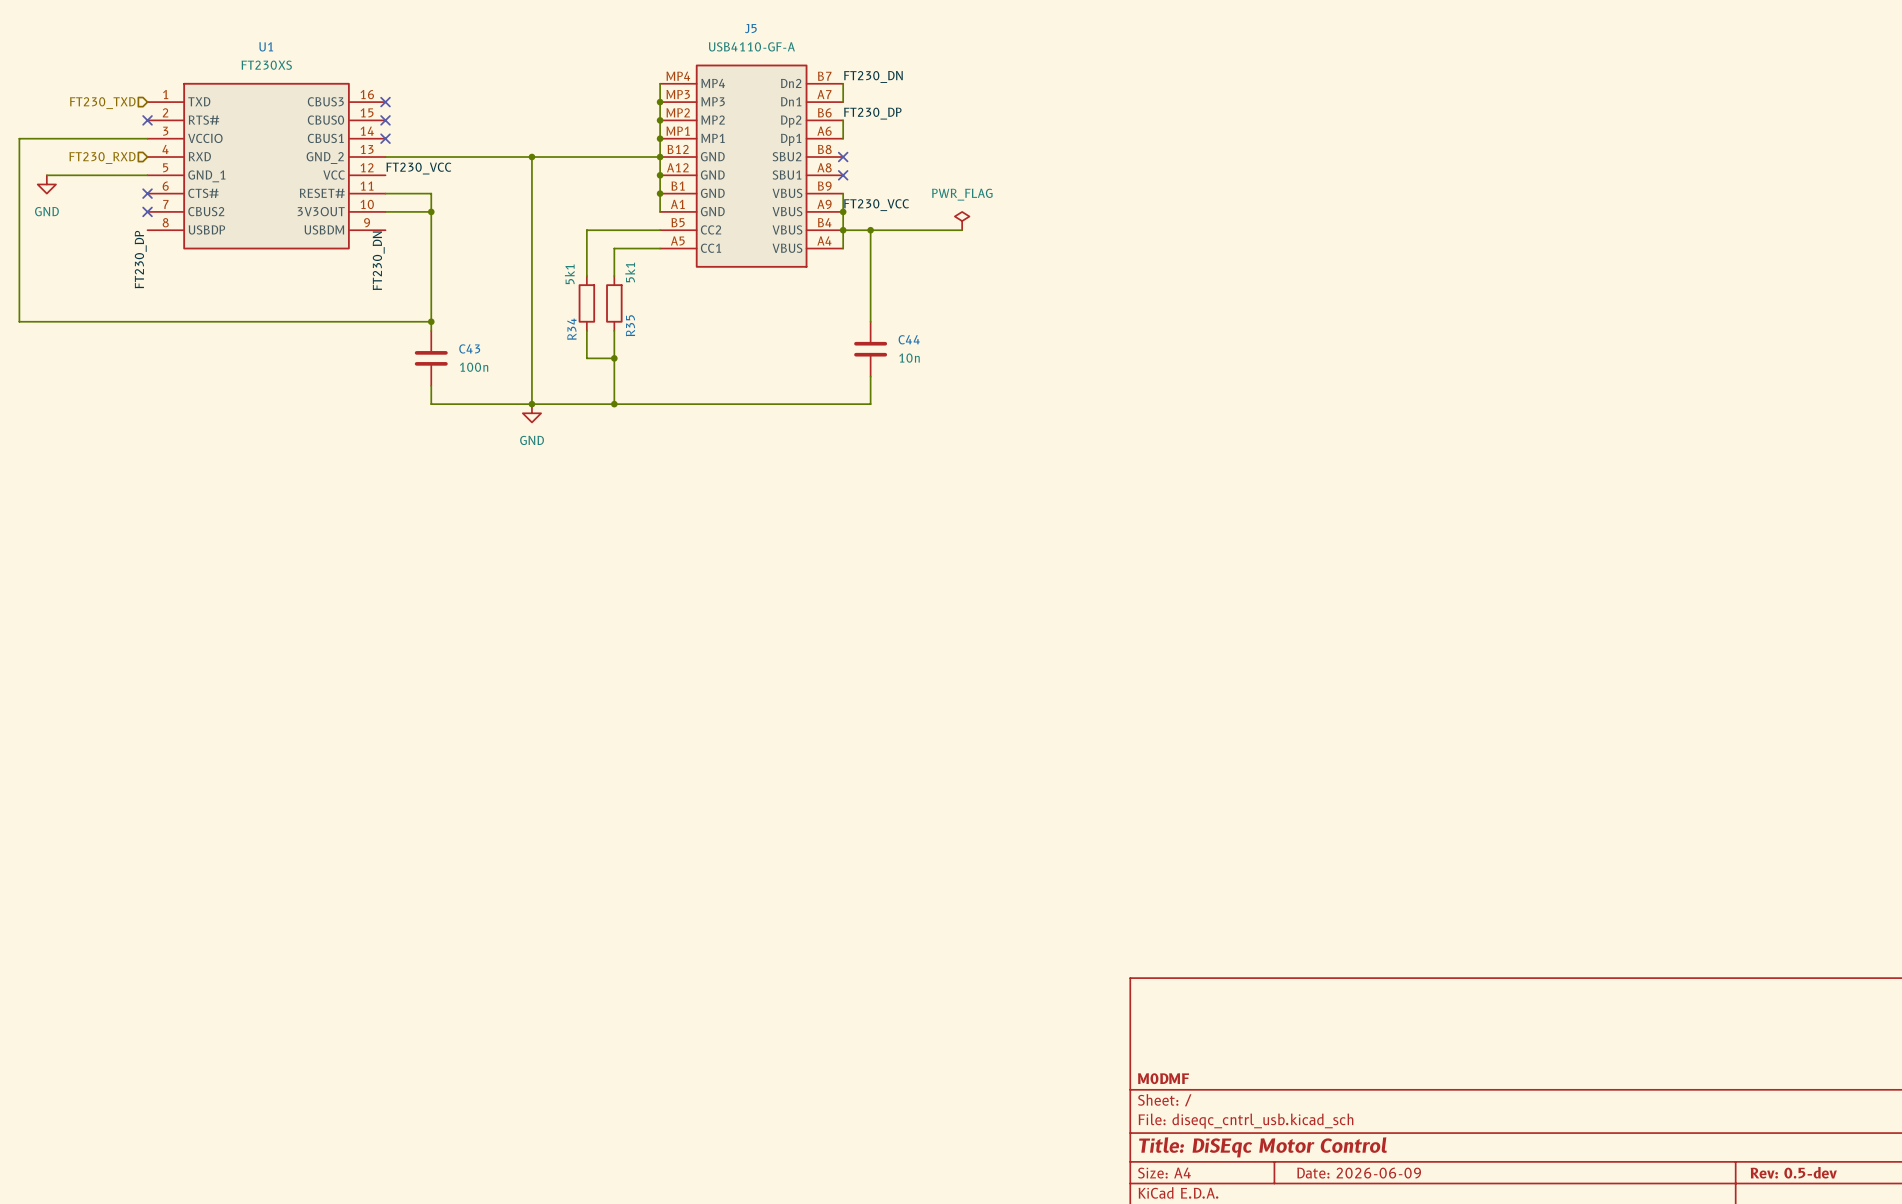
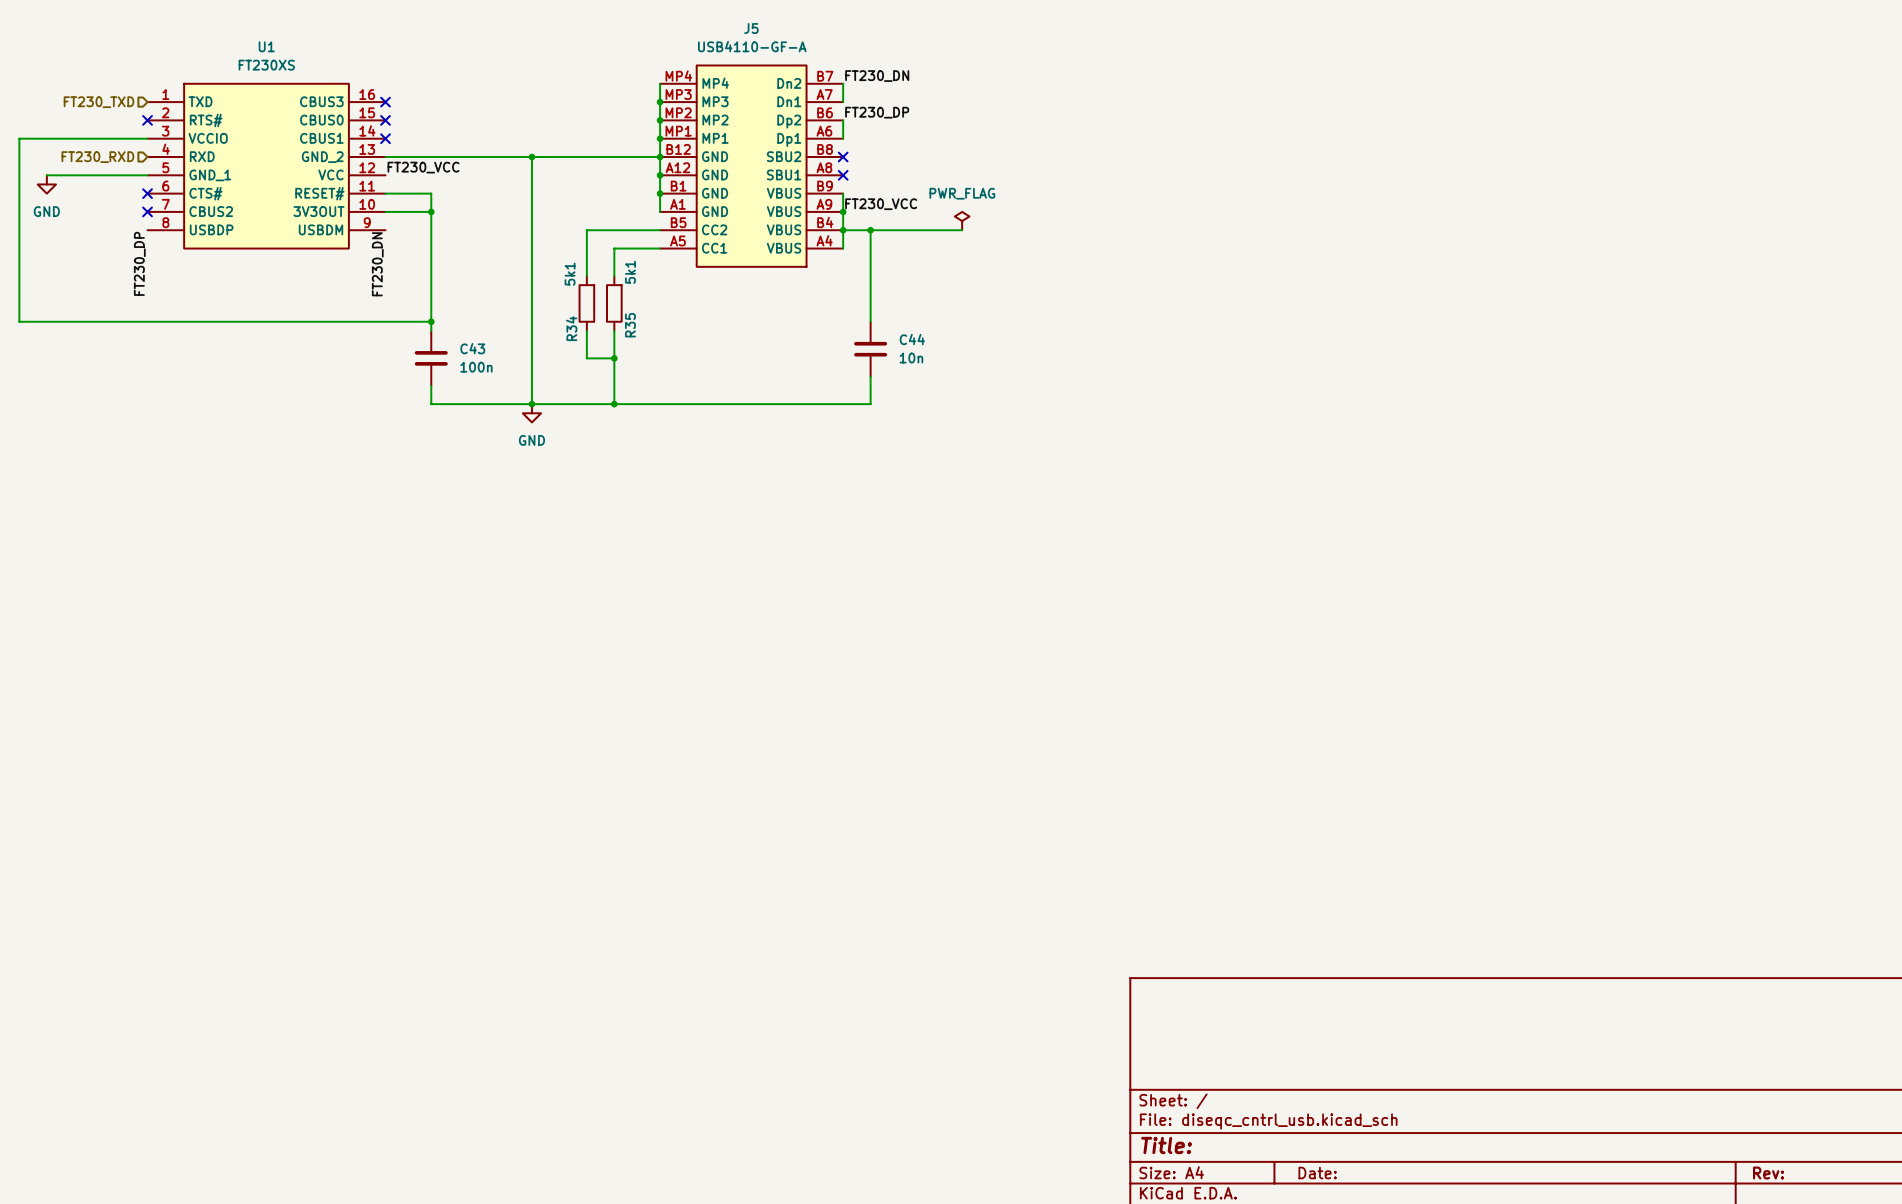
title block: M0DMF (1163, 1078) -> none
title block: Title: DiSEqc Motor Control (1262, 1147) -> Title: (1166, 1145)
title block: Rev: 0.5-dev (1793, 1172) -> Rev: (1768, 1173)
title block: Date: 2026-06-09 (1359, 1173) -> Date: (1317, 1173)

